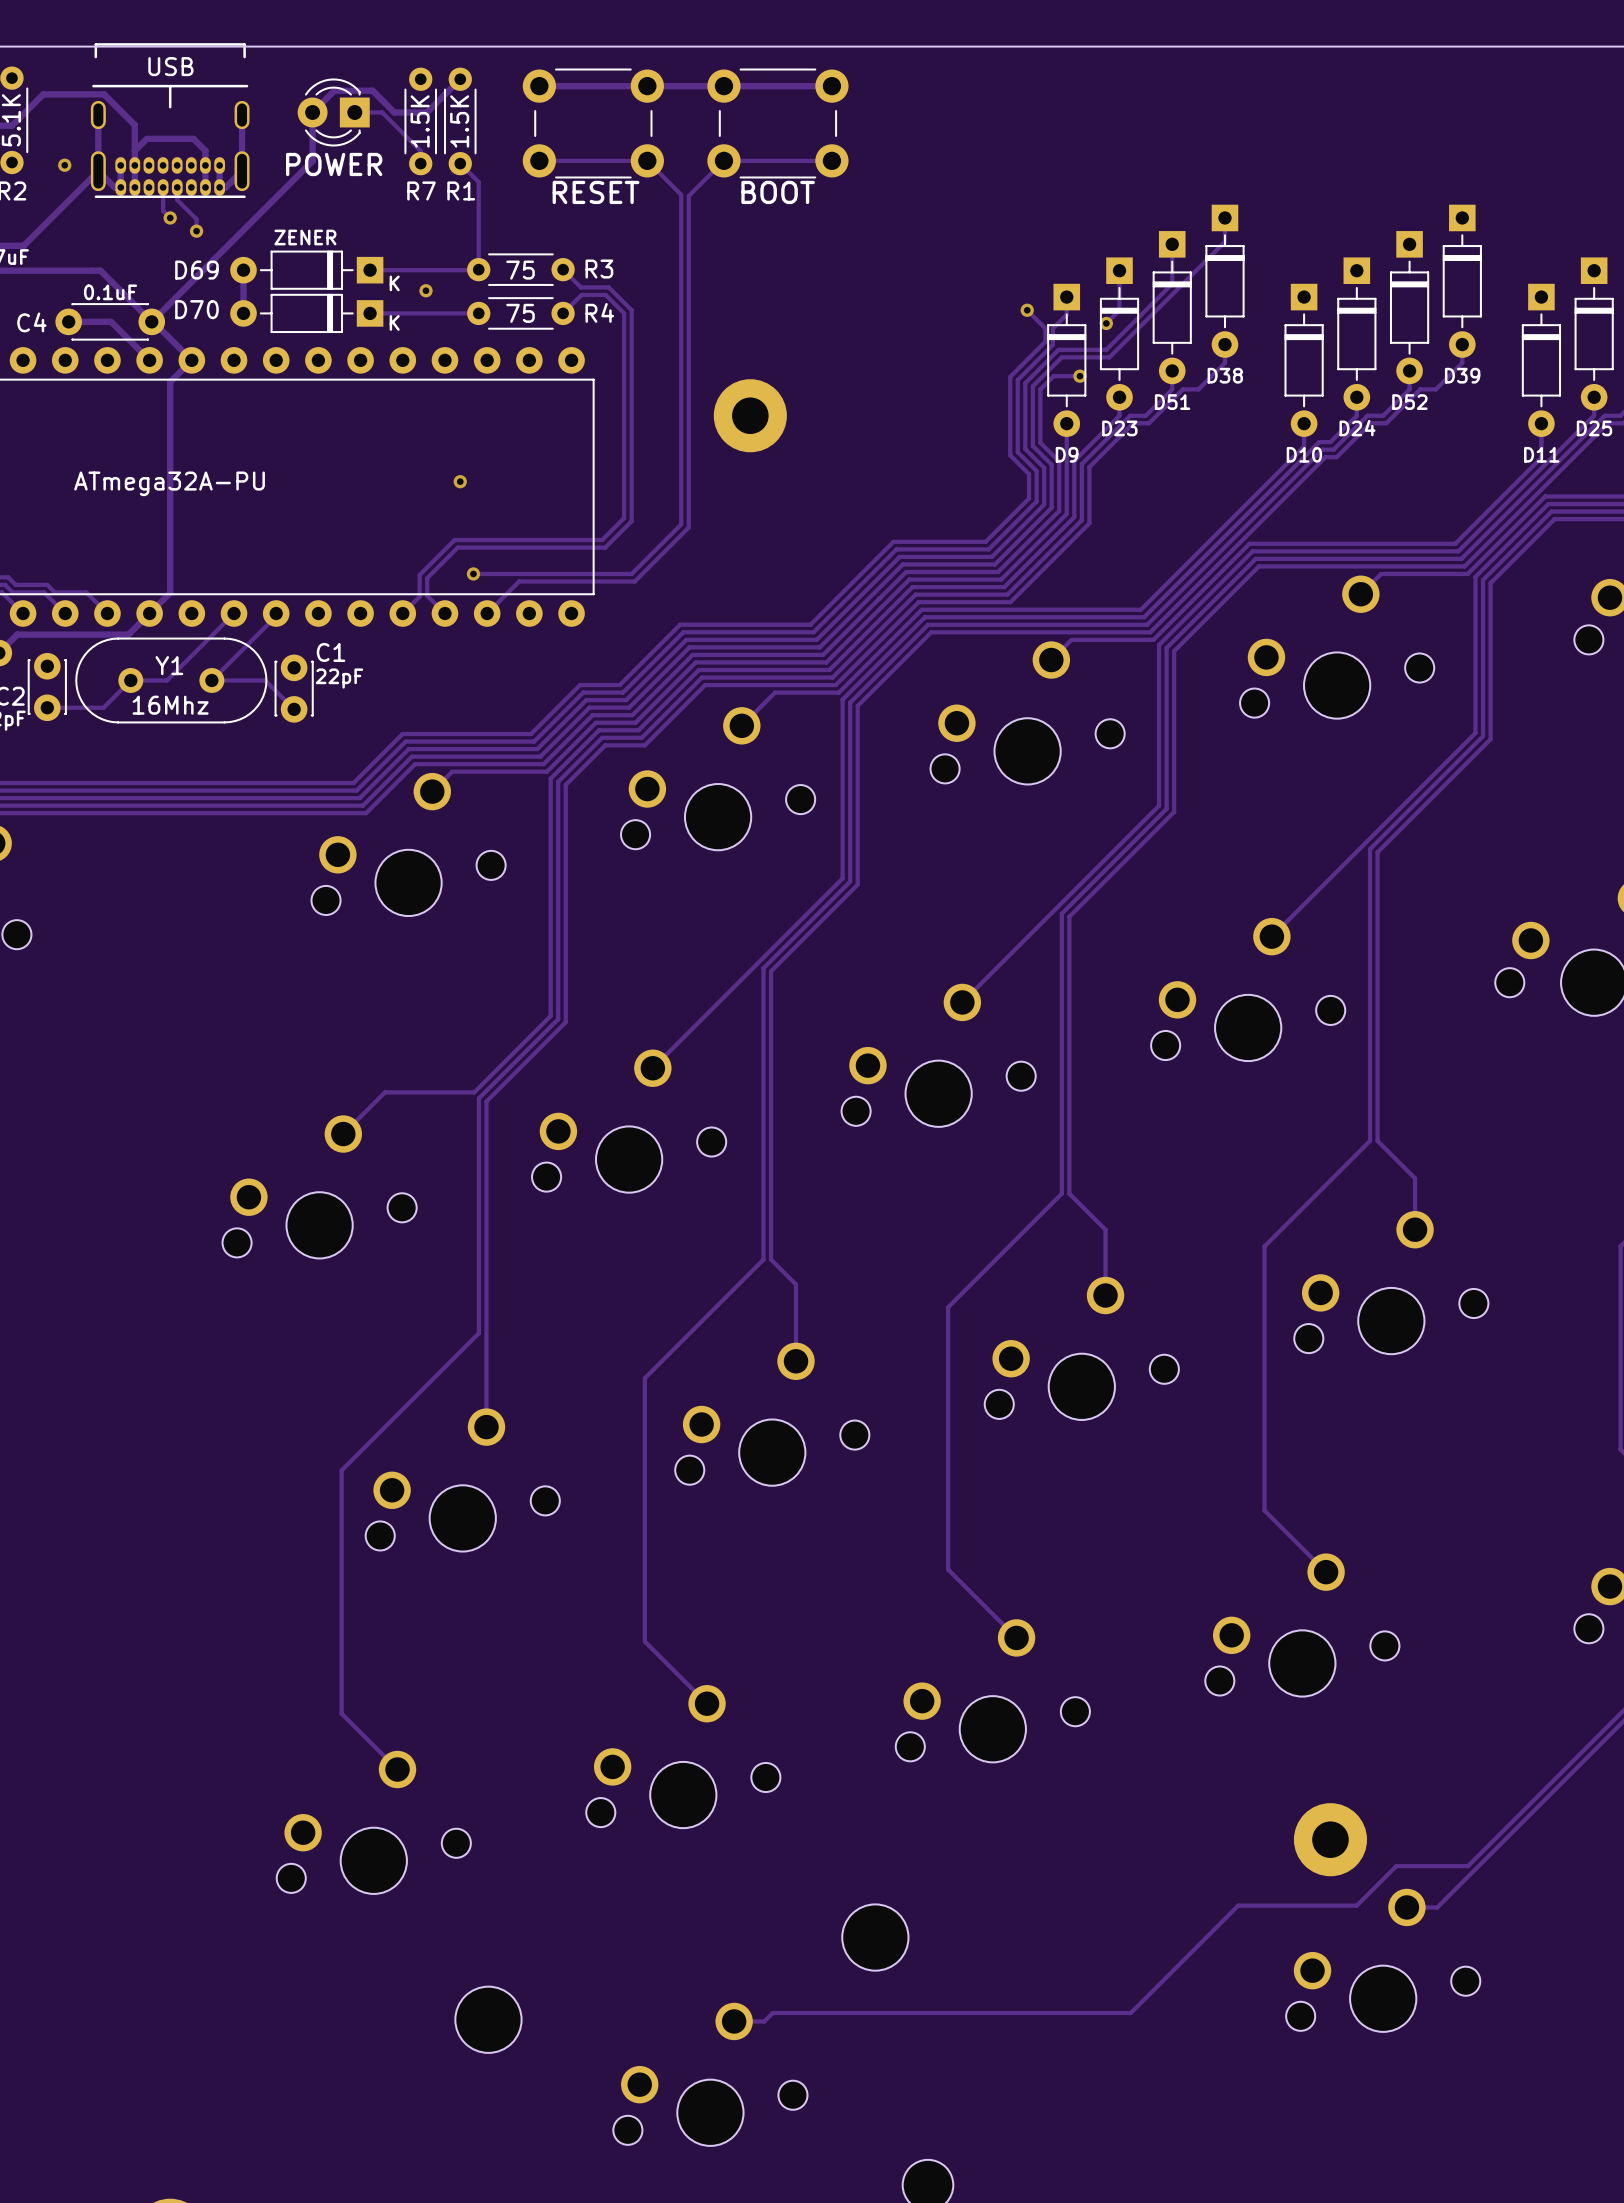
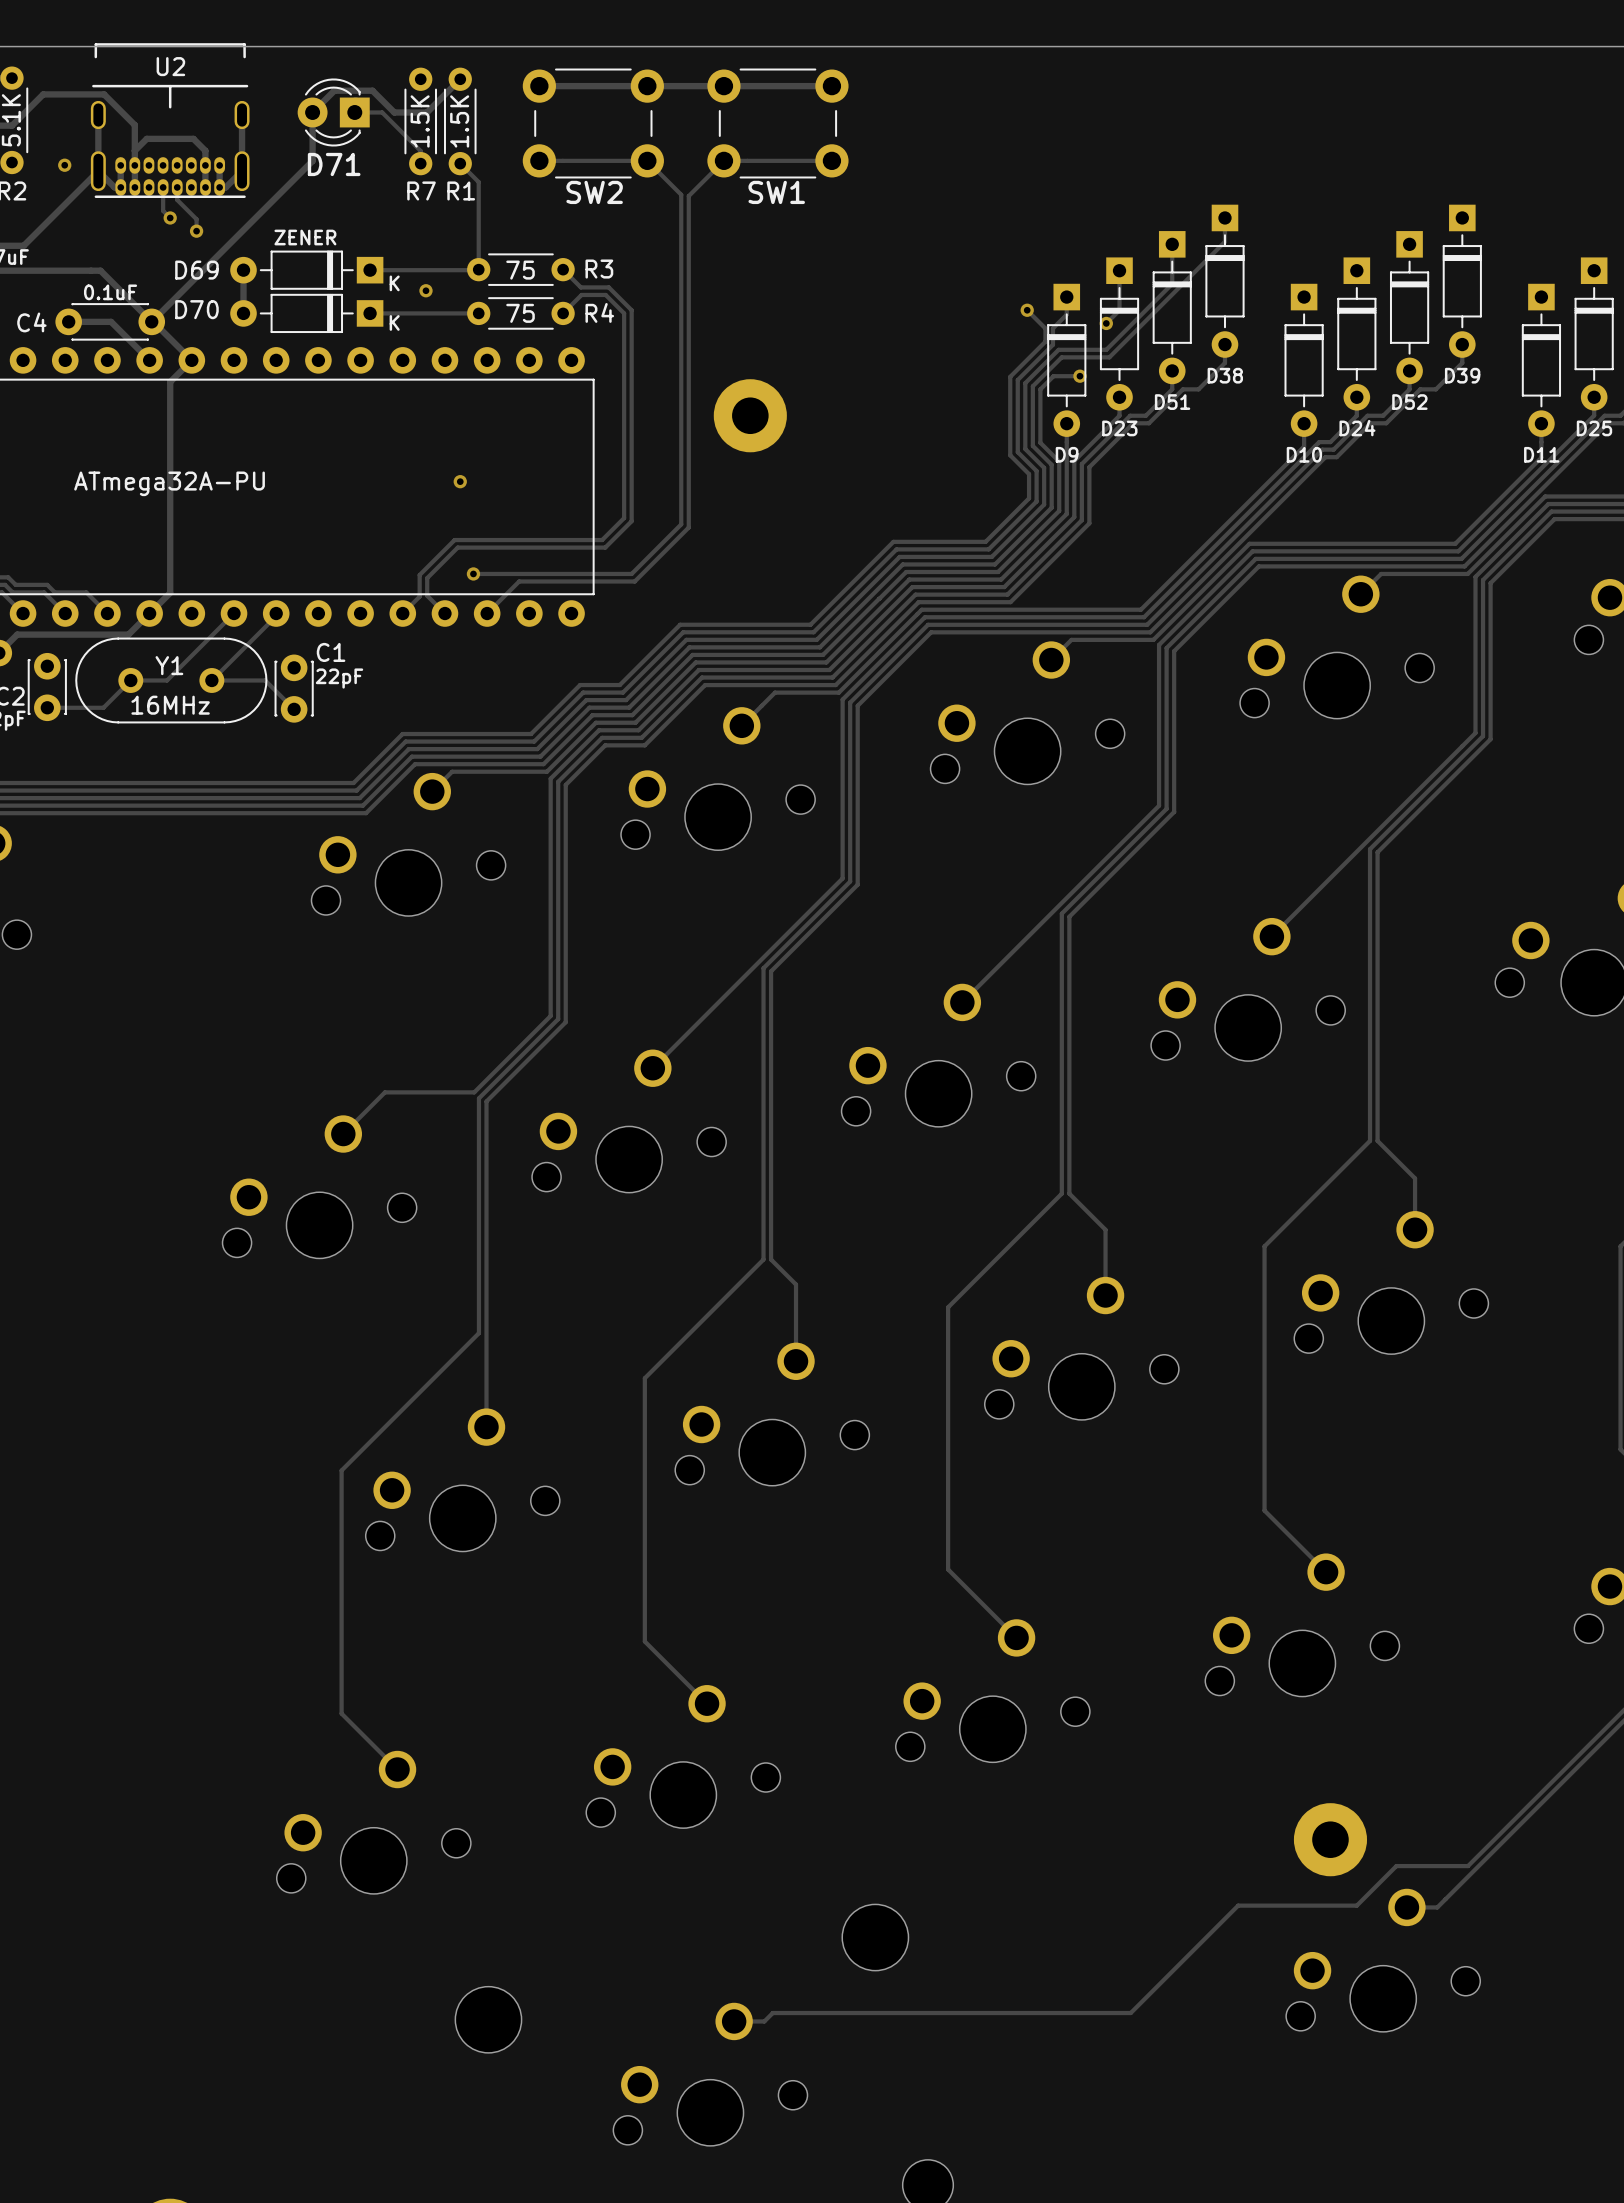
USB name: USB (170, 66) -> U2 (170, 66)
POWER name: POWER (334, 164) -> D71 (334, 164)
RESET name: RESET (596, 192) -> SW2 (594, 192)
BOOT name: BOOT (778, 192) -> SW1 (776, 192)
Y1 text: 16Mhz (170, 705) -> 16MHz (170, 705)

